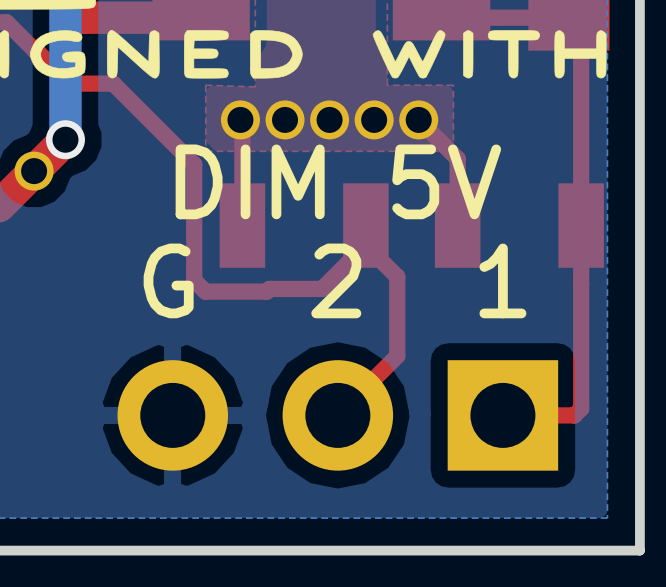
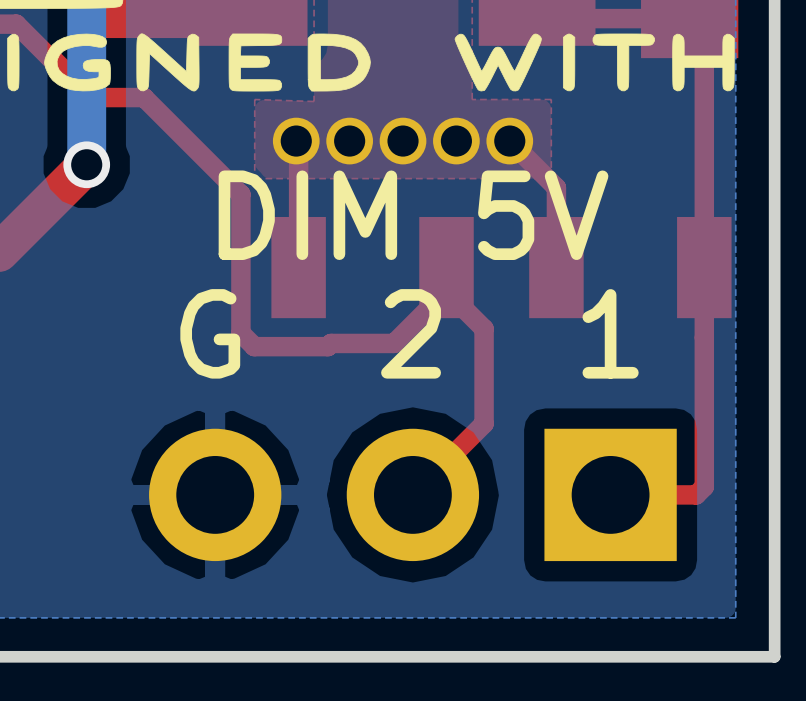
part: (34, 171) -> none

